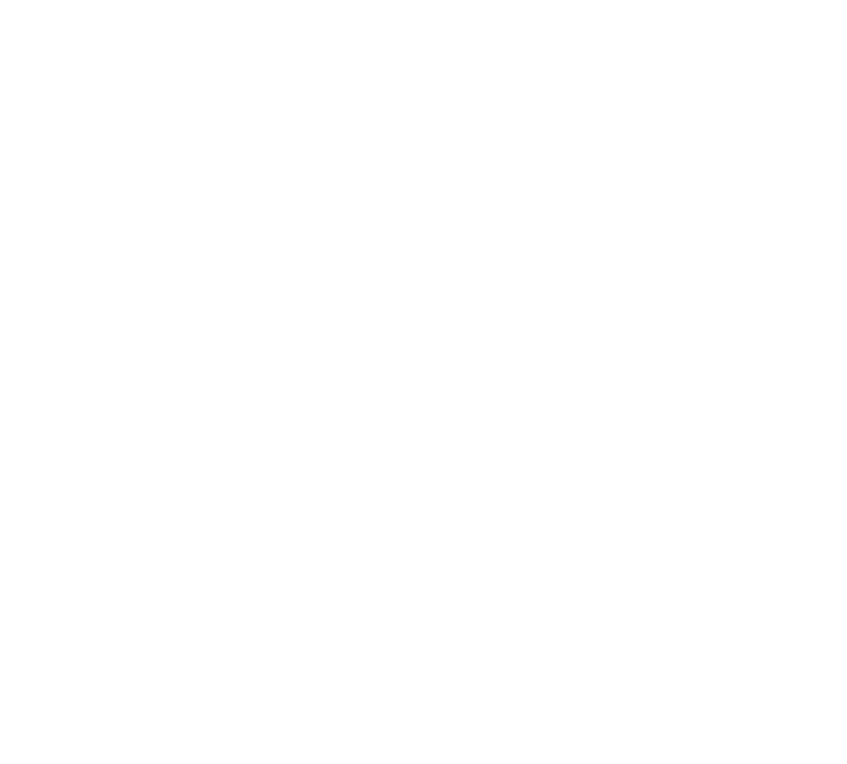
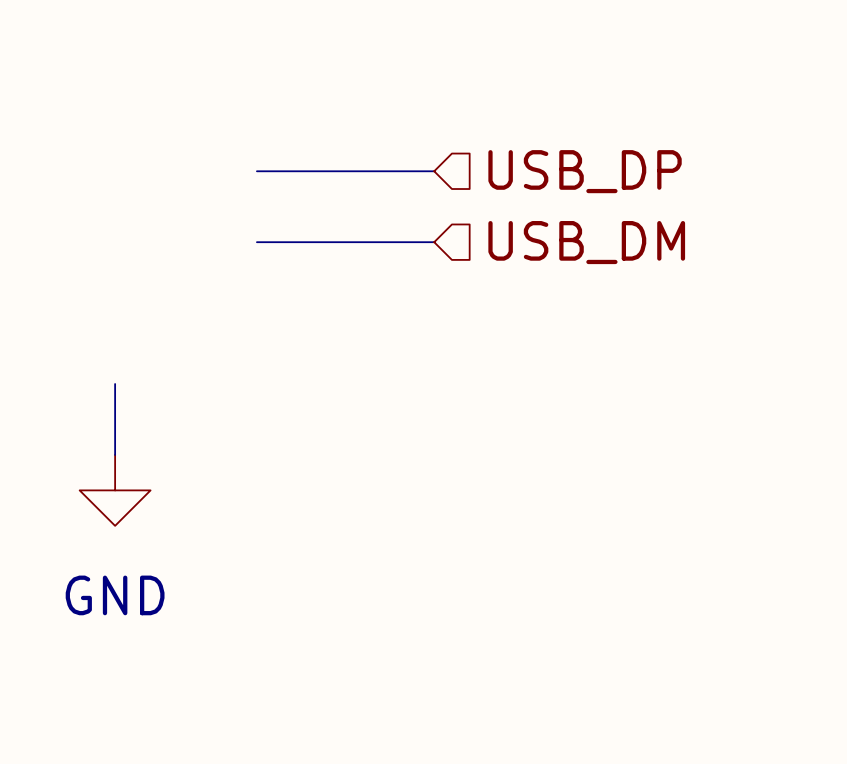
wire: none -> (256, 171) (434, 171)
hierarchical label: none -> USB_DP (585, 171)
wire: none -> (256, 242) (434, 242)
hierarchical label: none -> USB_DM (586, 242)
wire: none -> (115, 384) (115, 454)
power symbol: none -> GND (115, 490)

